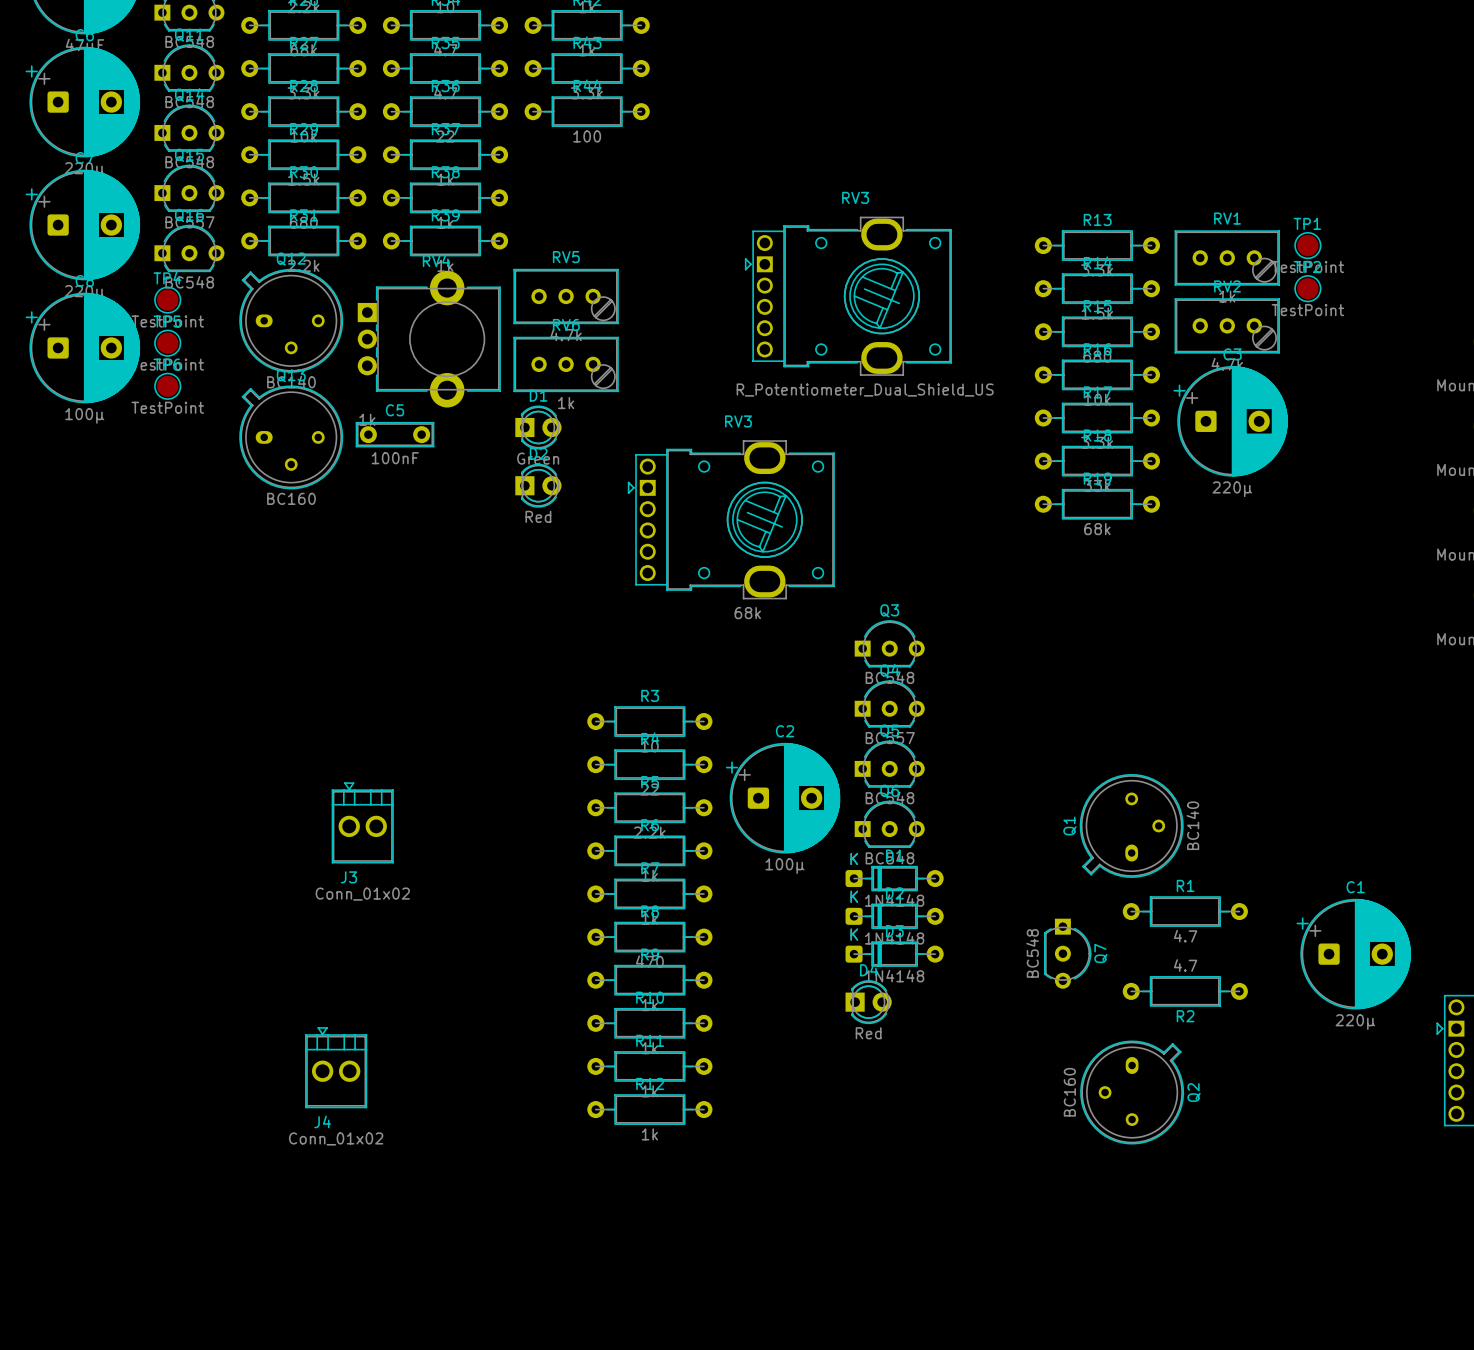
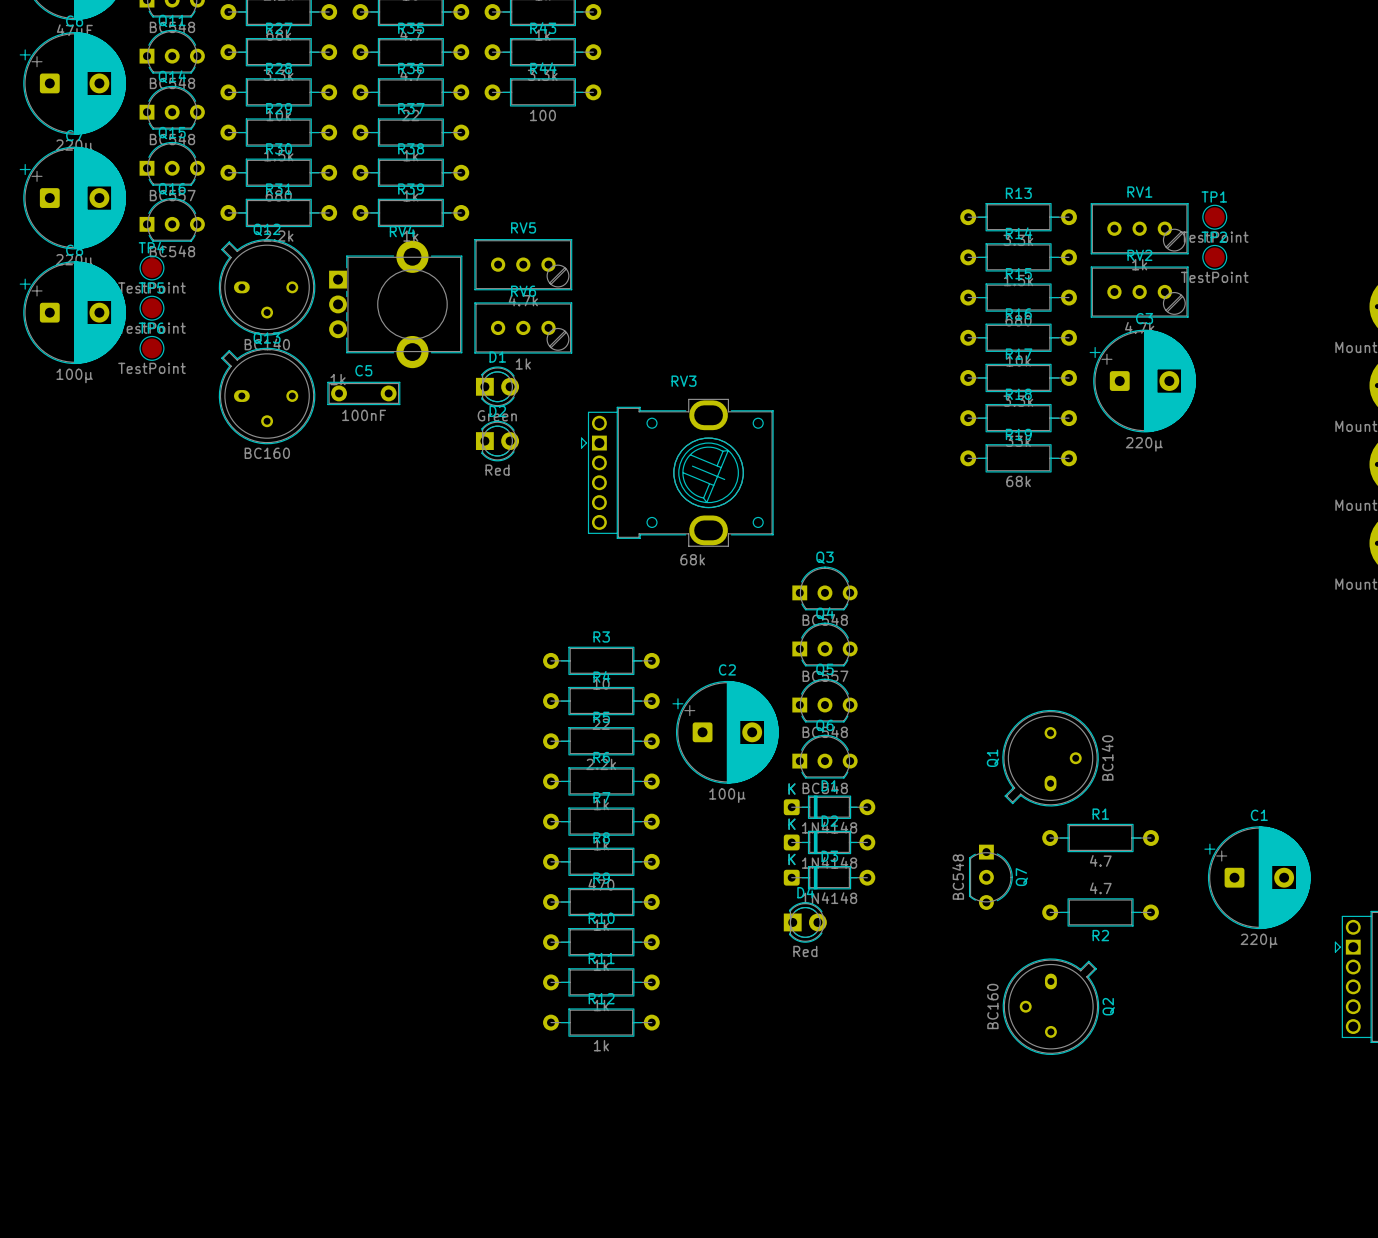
RV3: R_Potentiometer_Dual_Shield_US (848, 296) -> none
J3: Conn_01x02 (362, 822) -> none
J4: Conn_01x02 (336, 1067) -> none

